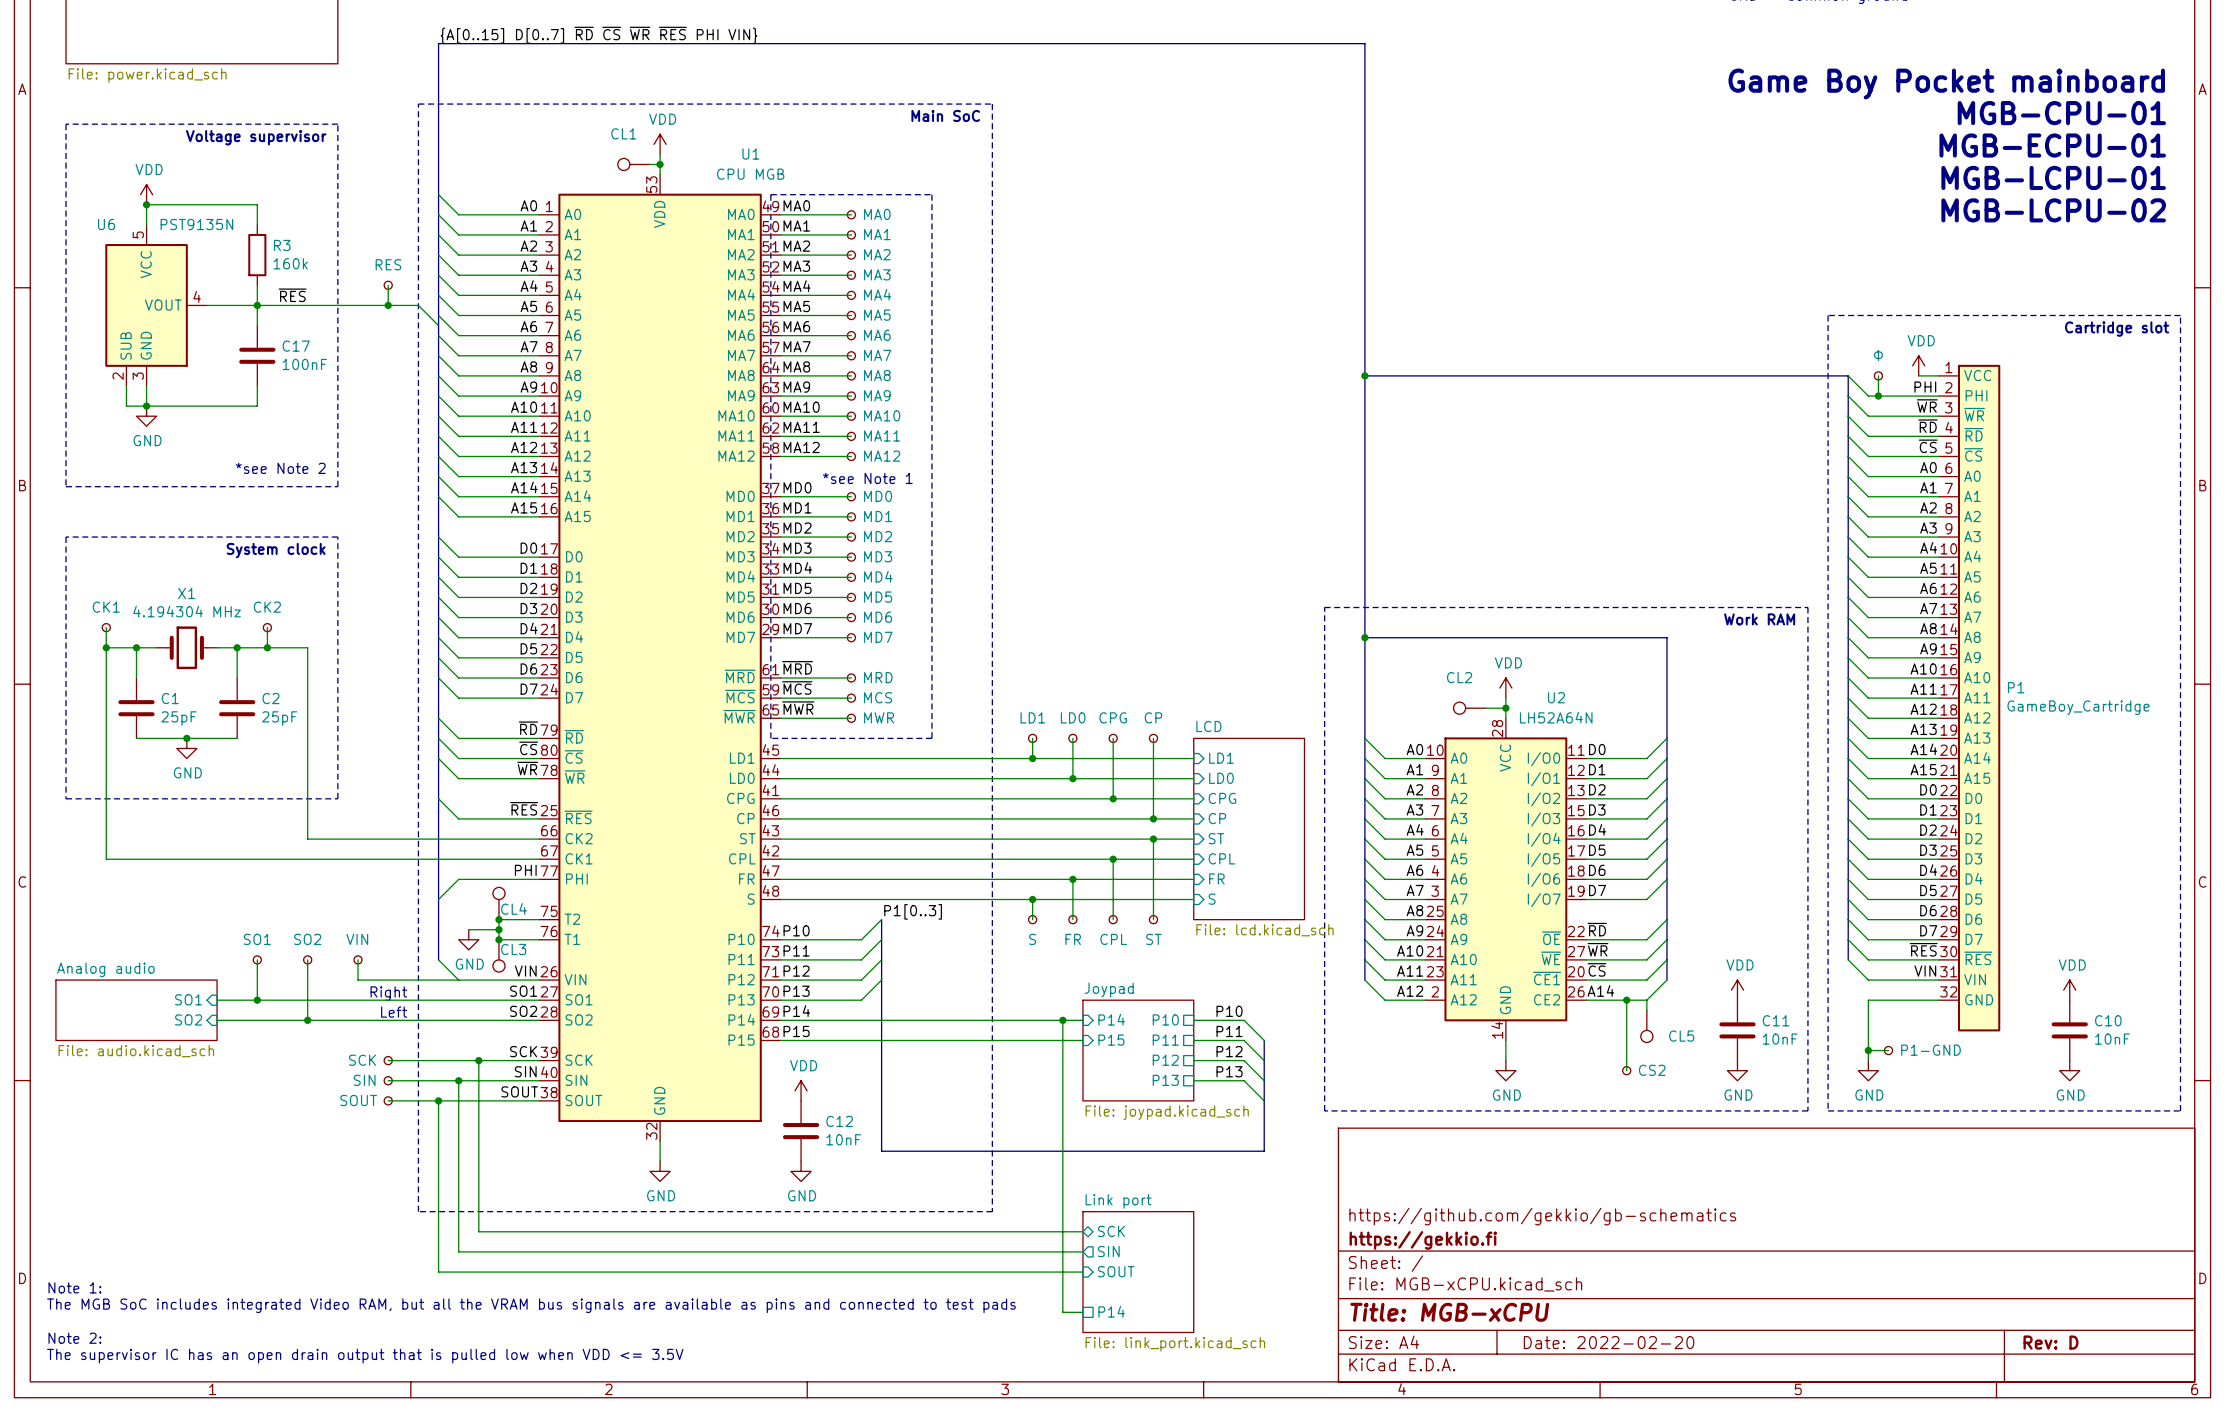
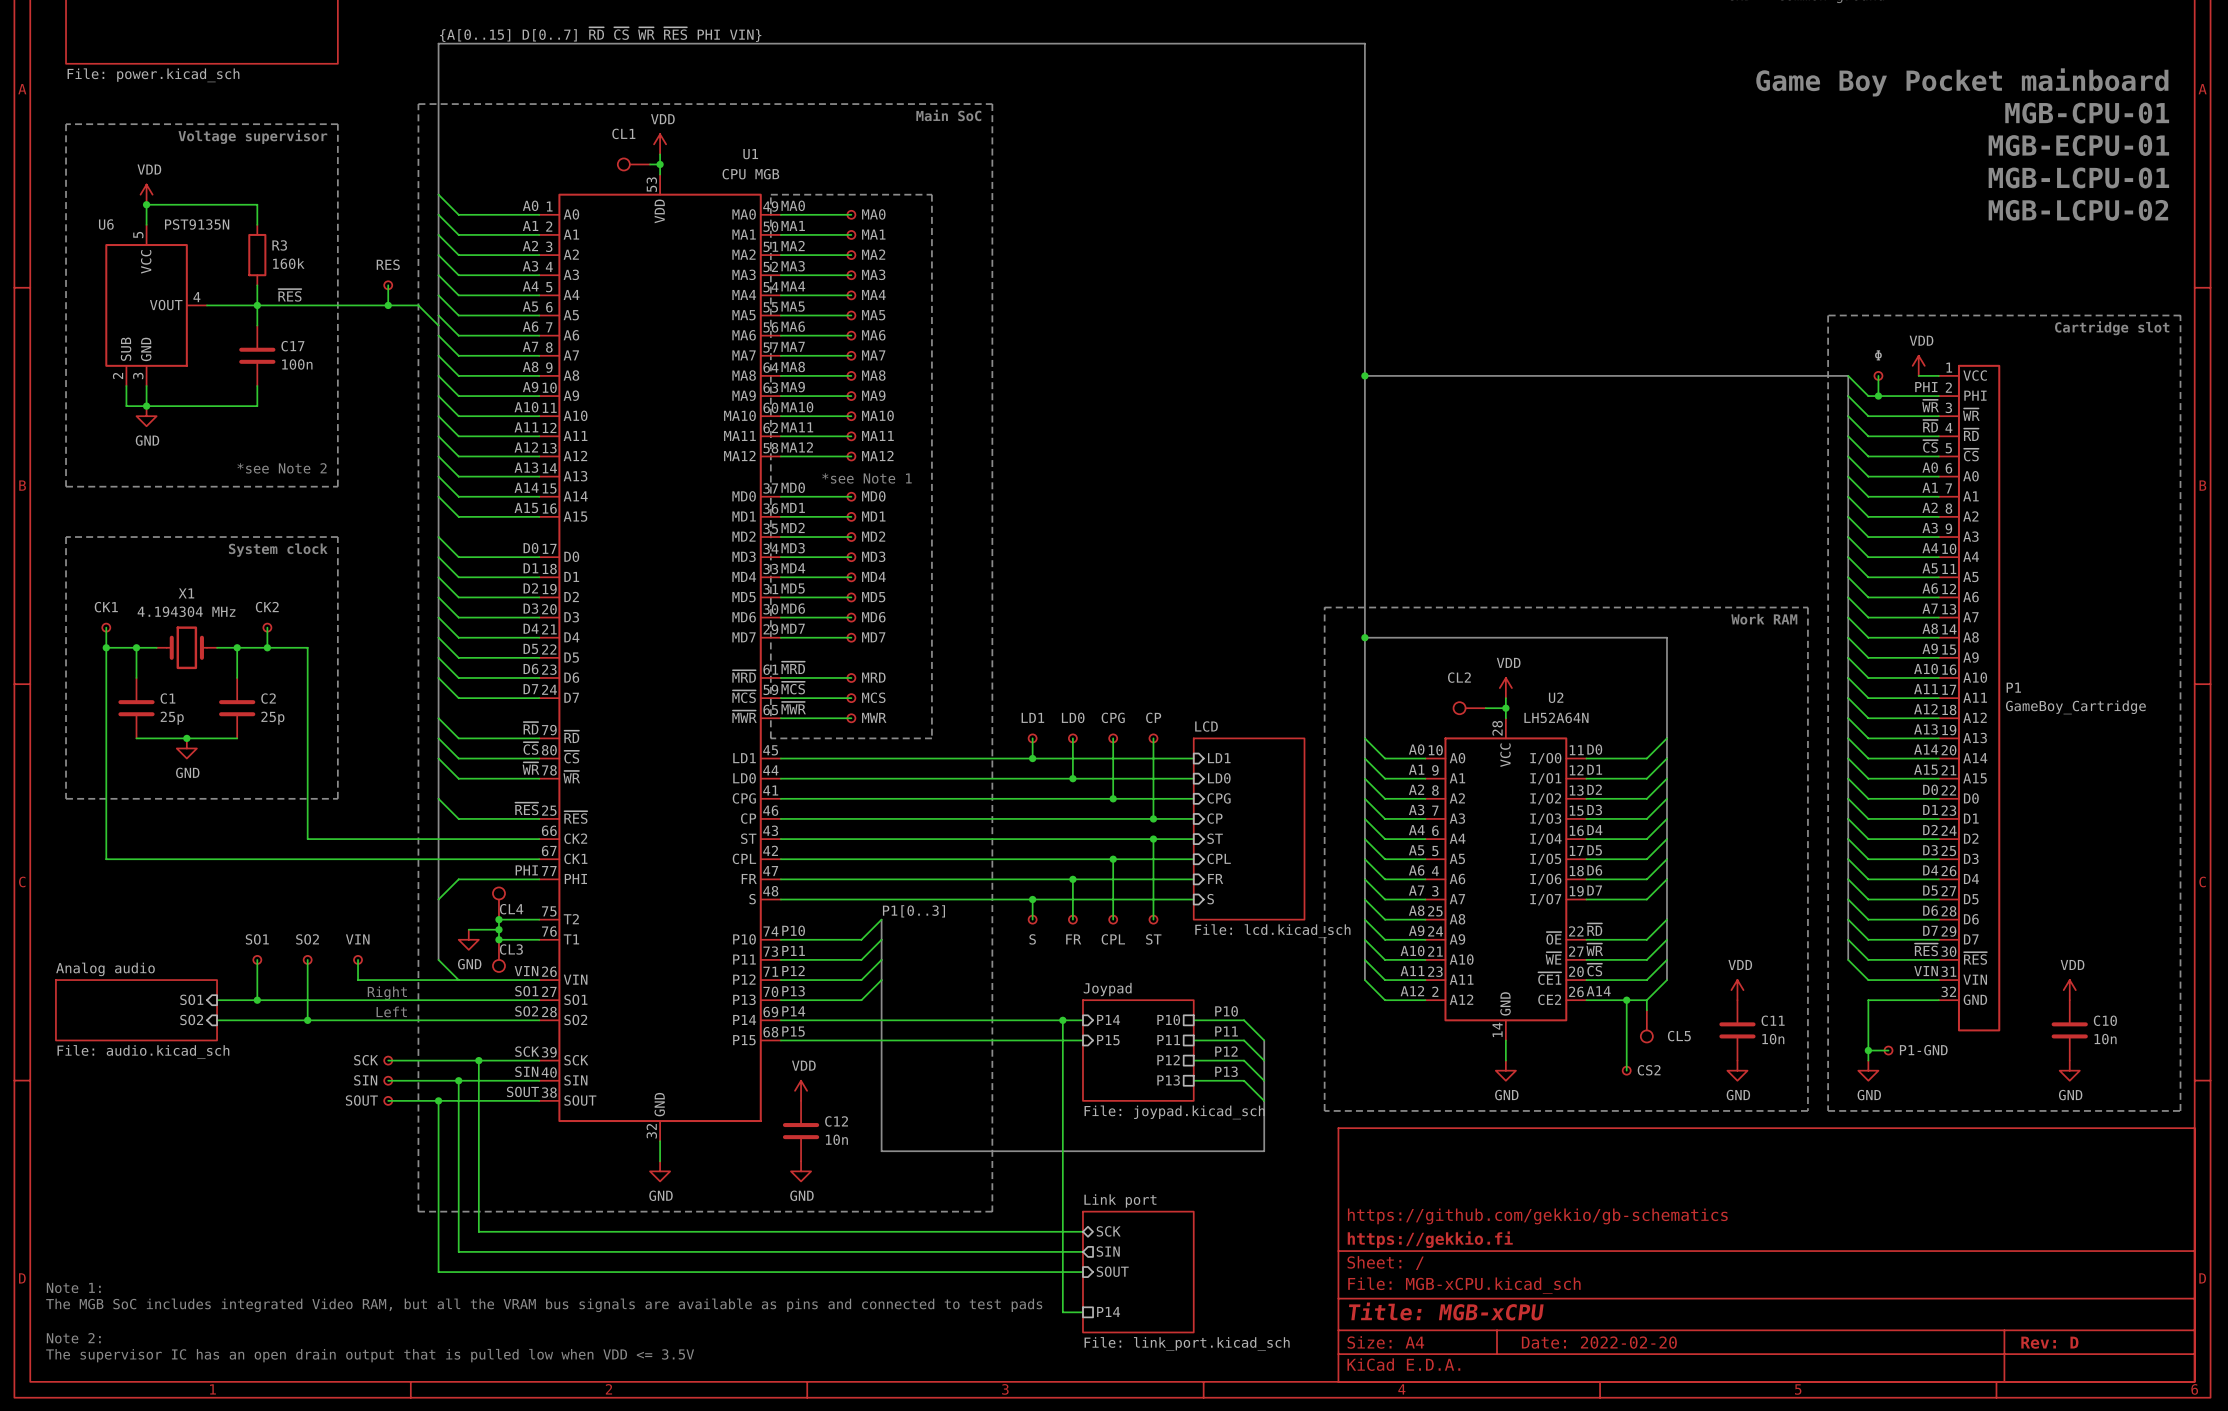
C17 value: 100nF (304, 364) -> 100n (297, 364)
C1 value: 25pF (178, 718) -> 25p (172, 718)
C2 value: 25pF (279, 718) -> 25p (272, 718)
C11 value: 10nF (1780, 1039) -> 10n (1773, 1039)
C10 value: 10nF (2112, 1039) -> 10n (2105, 1039)
C12 value: 10nF (843, 1139) -> 10n (836, 1139)

